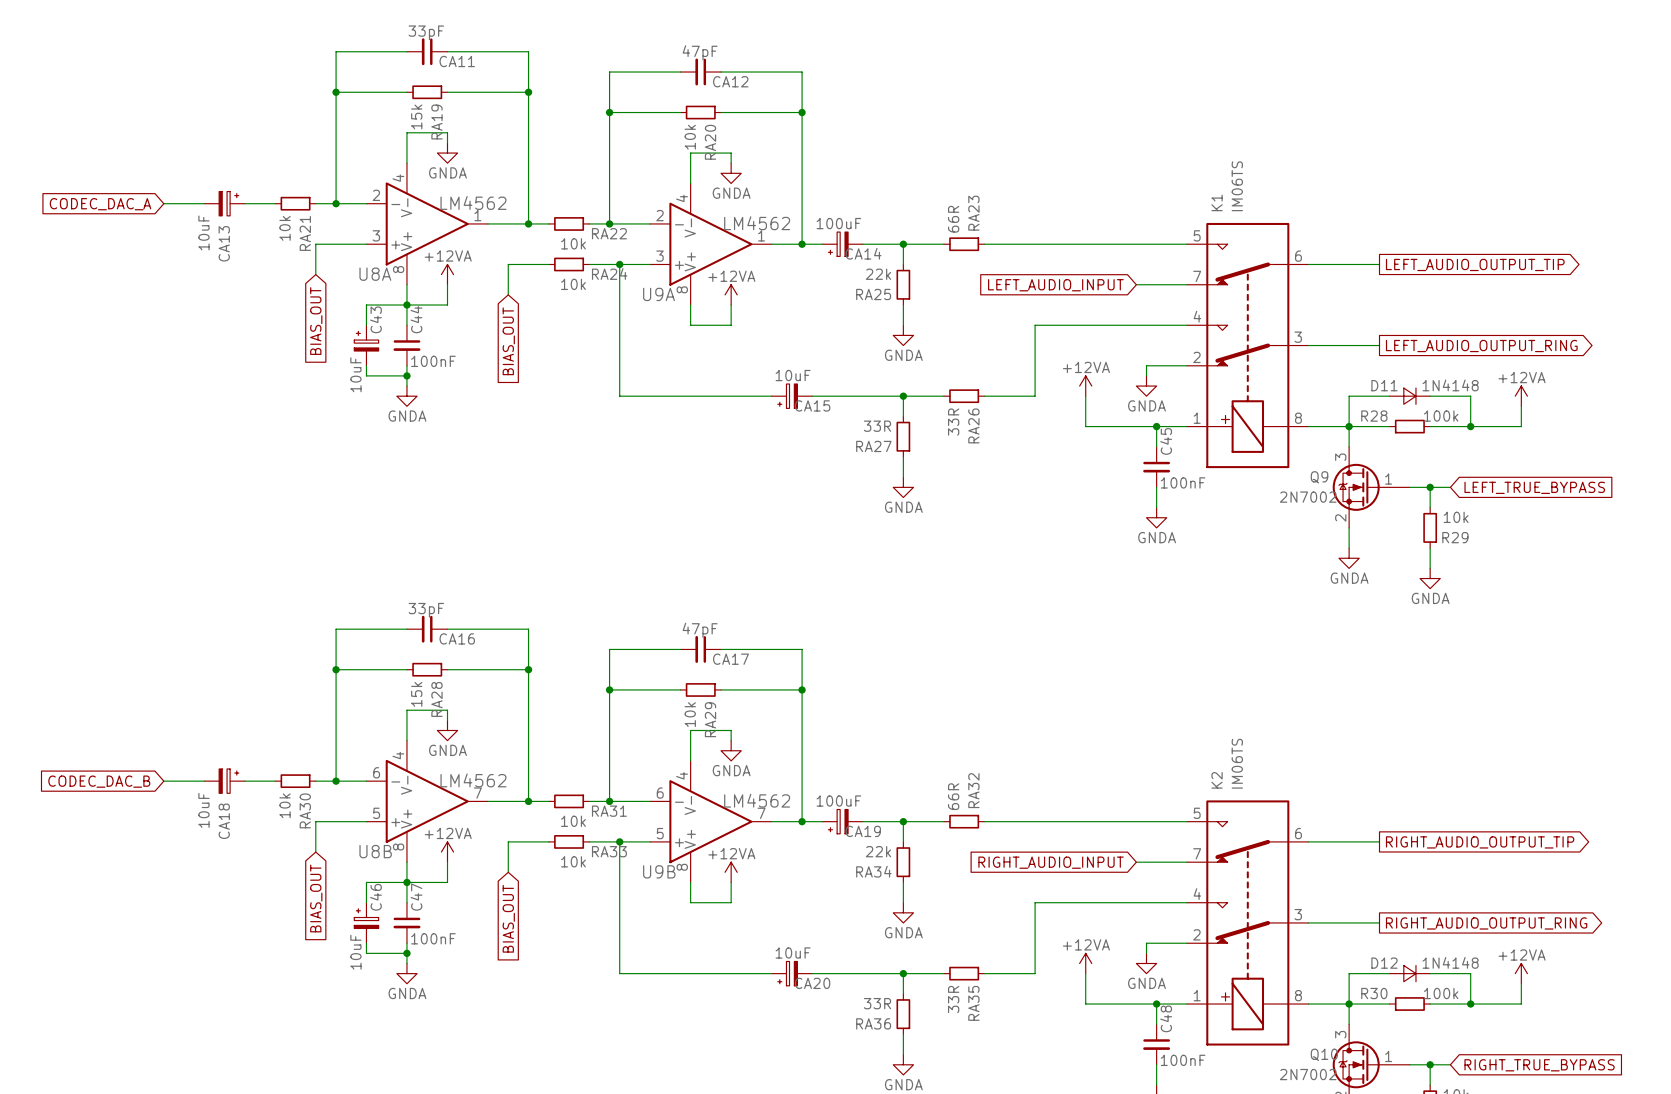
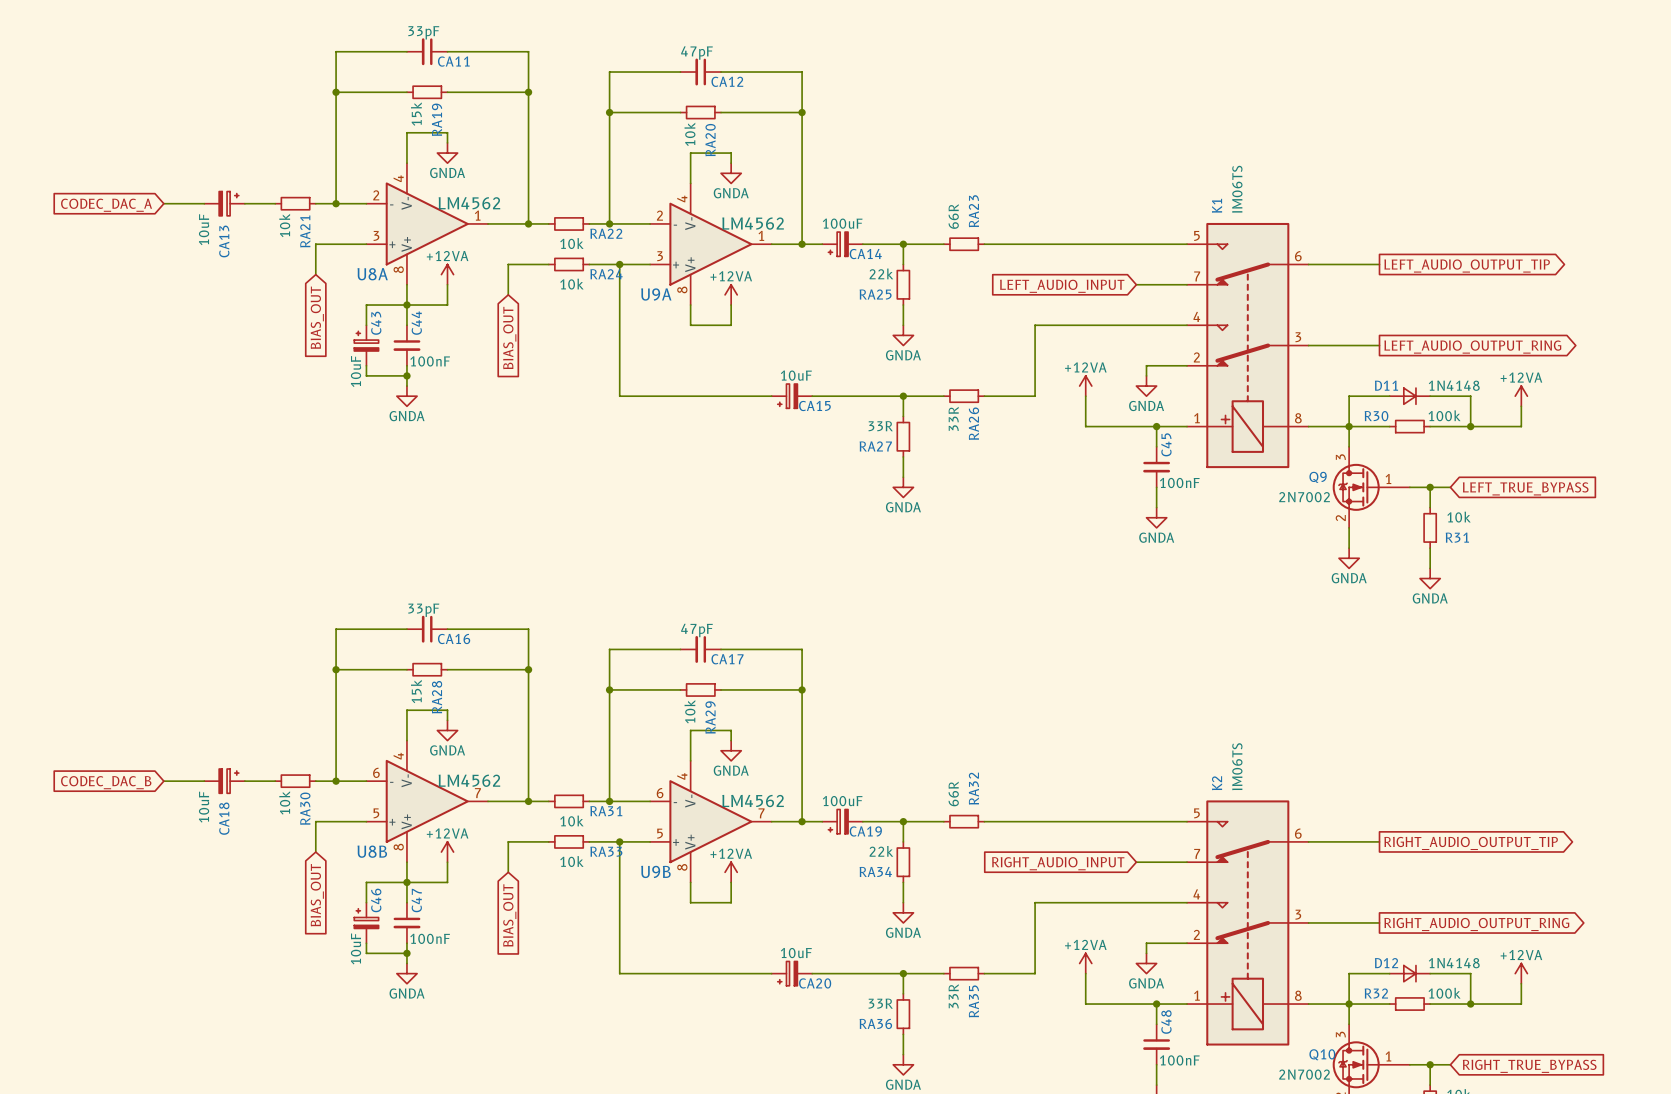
R28 name: R28 (1374, 416) -> R30 (1376, 416)
R29 name: R29 (1455, 537) -> R31 (1457, 537)
R30 name: R30 (1374, 993) -> R32 (1376, 993)

